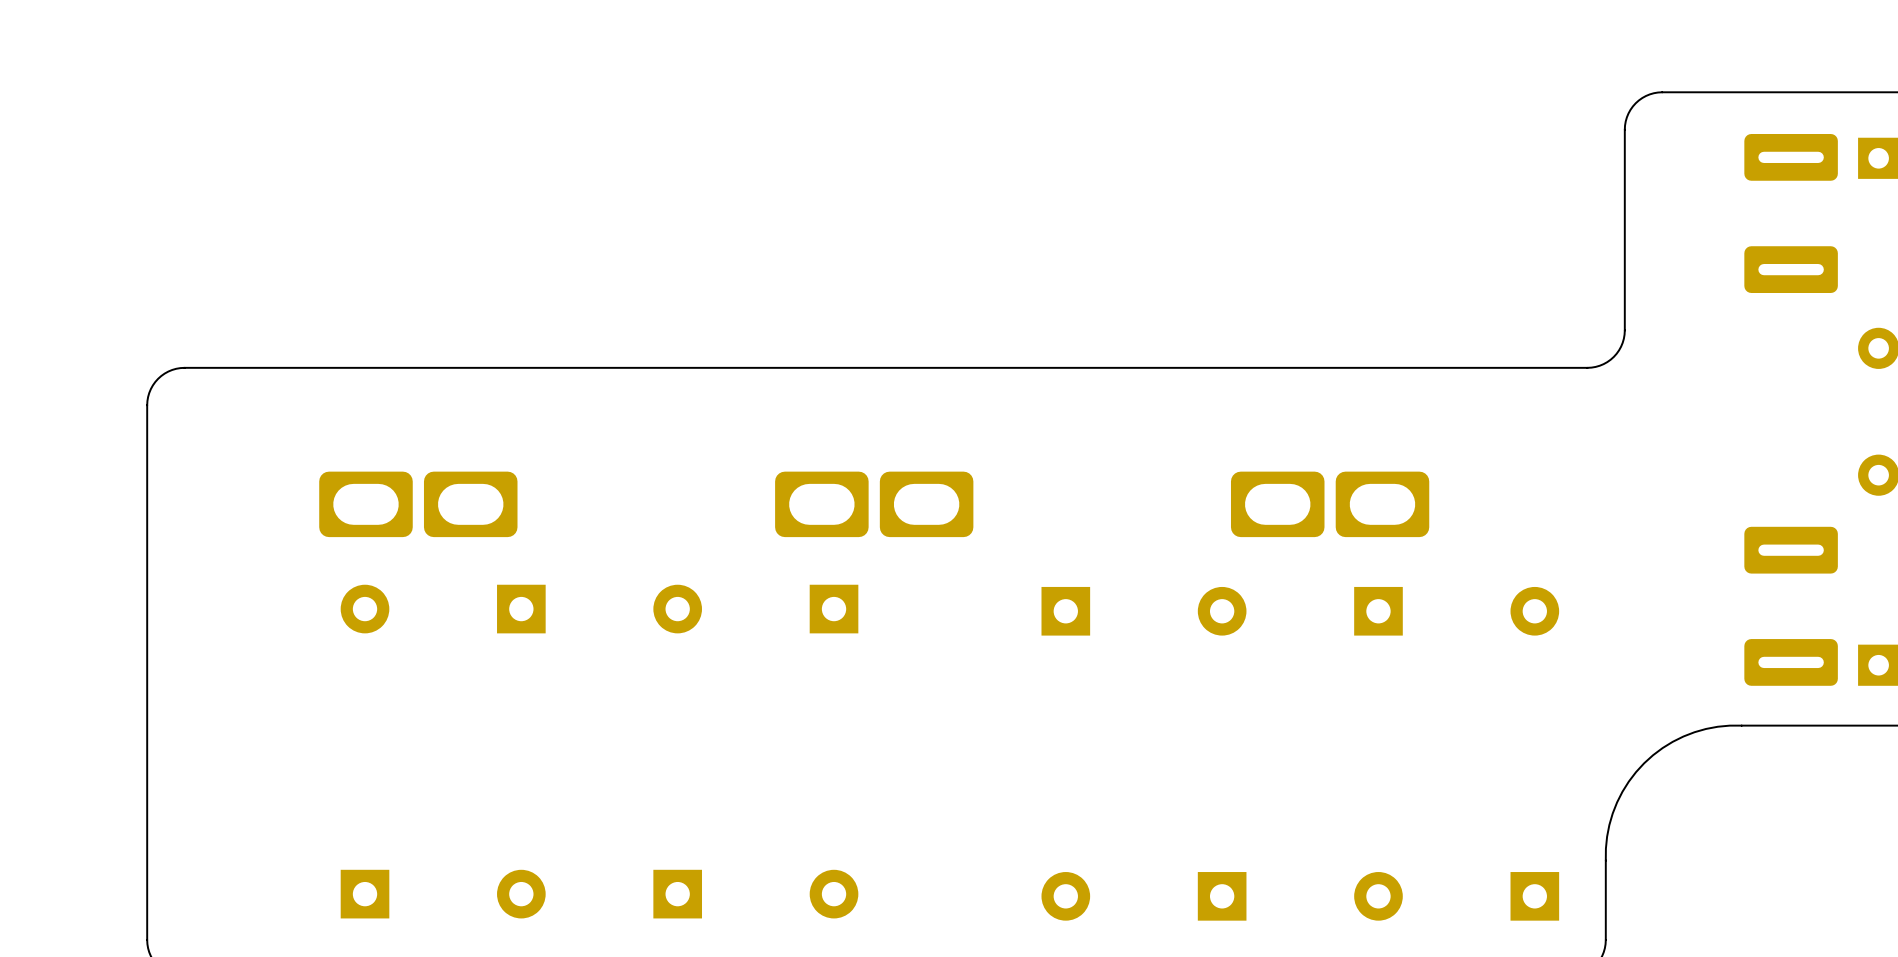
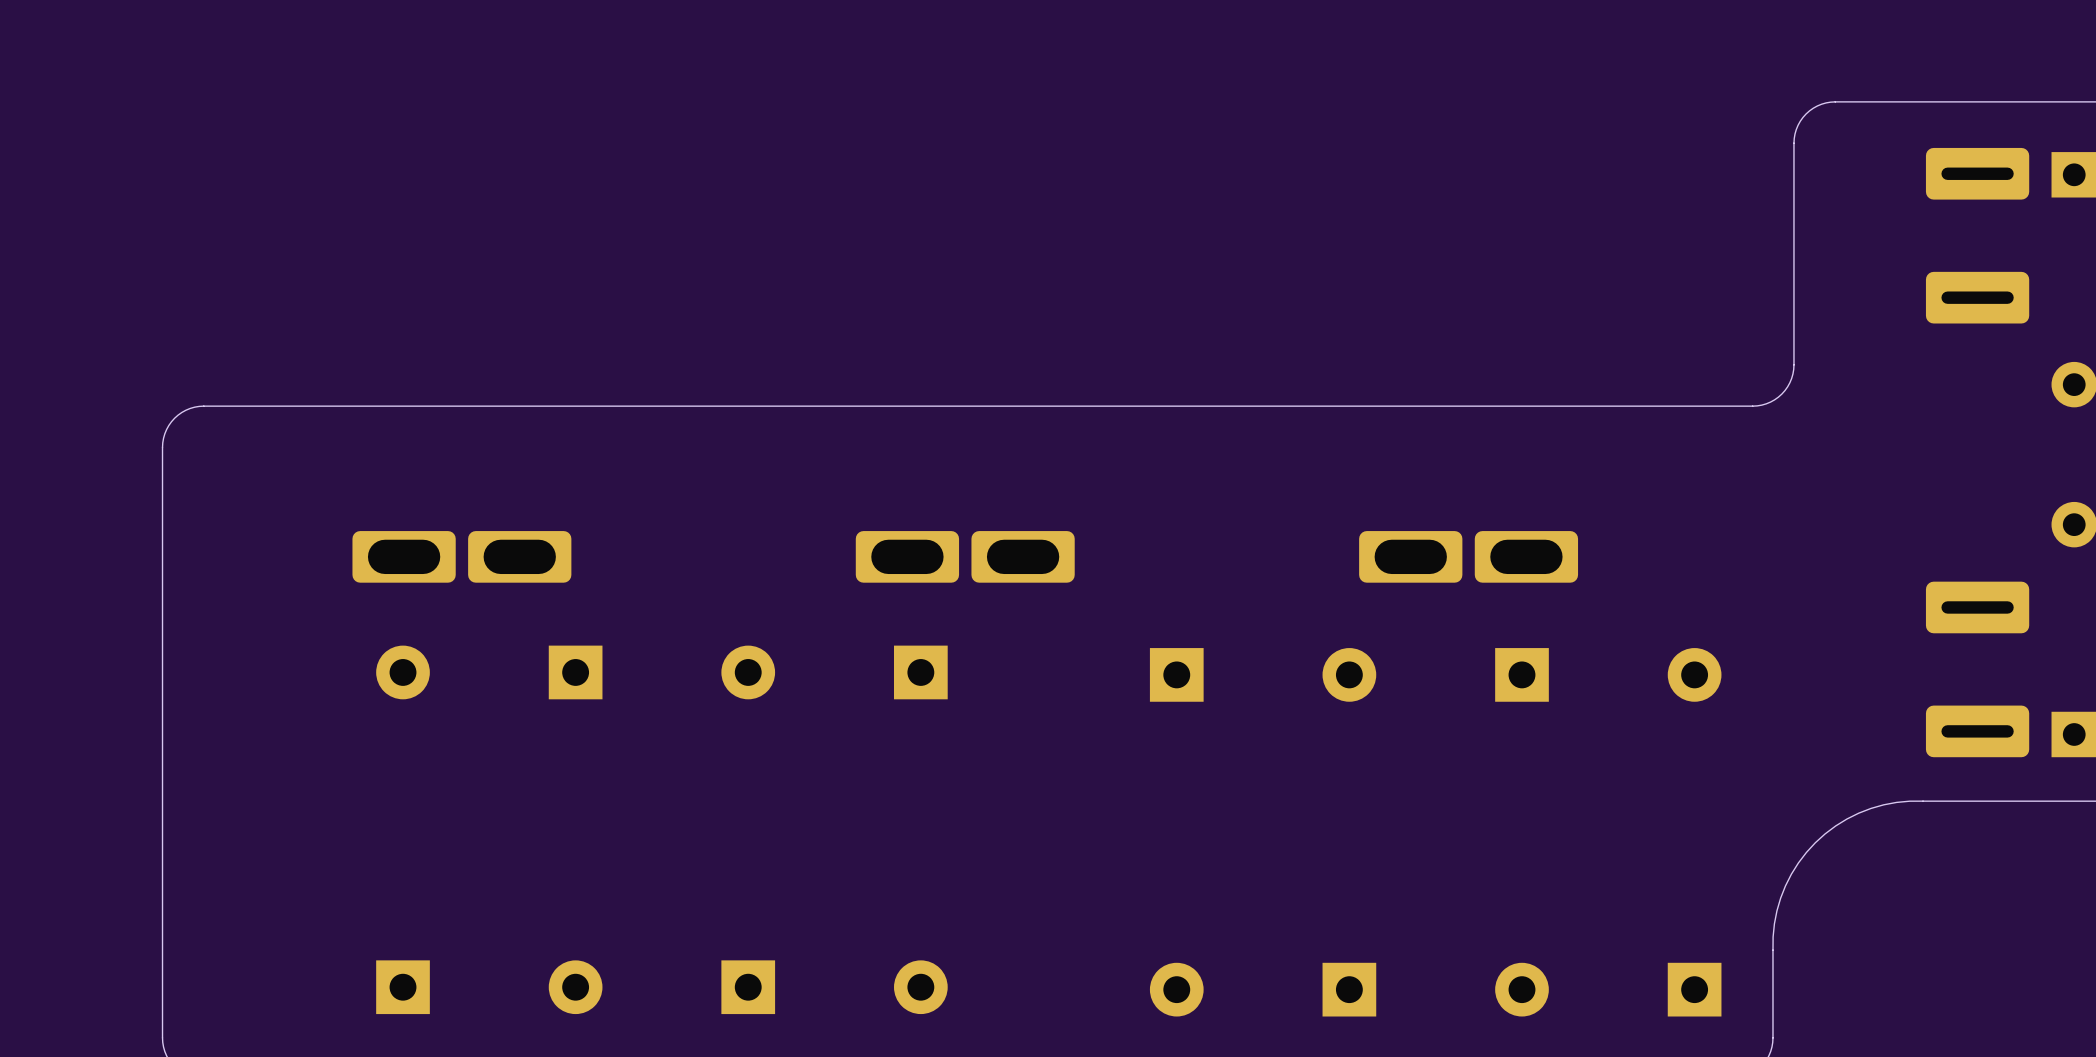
part footprint: [319, 471, 518, 538] -> [352, 531, 572, 583]
part footprint: [775, 471, 974, 538] -> [855, 531, 1075, 583]
part footprint: [1230, 471, 1430, 538] -> [1359, 531, 1579, 583]

